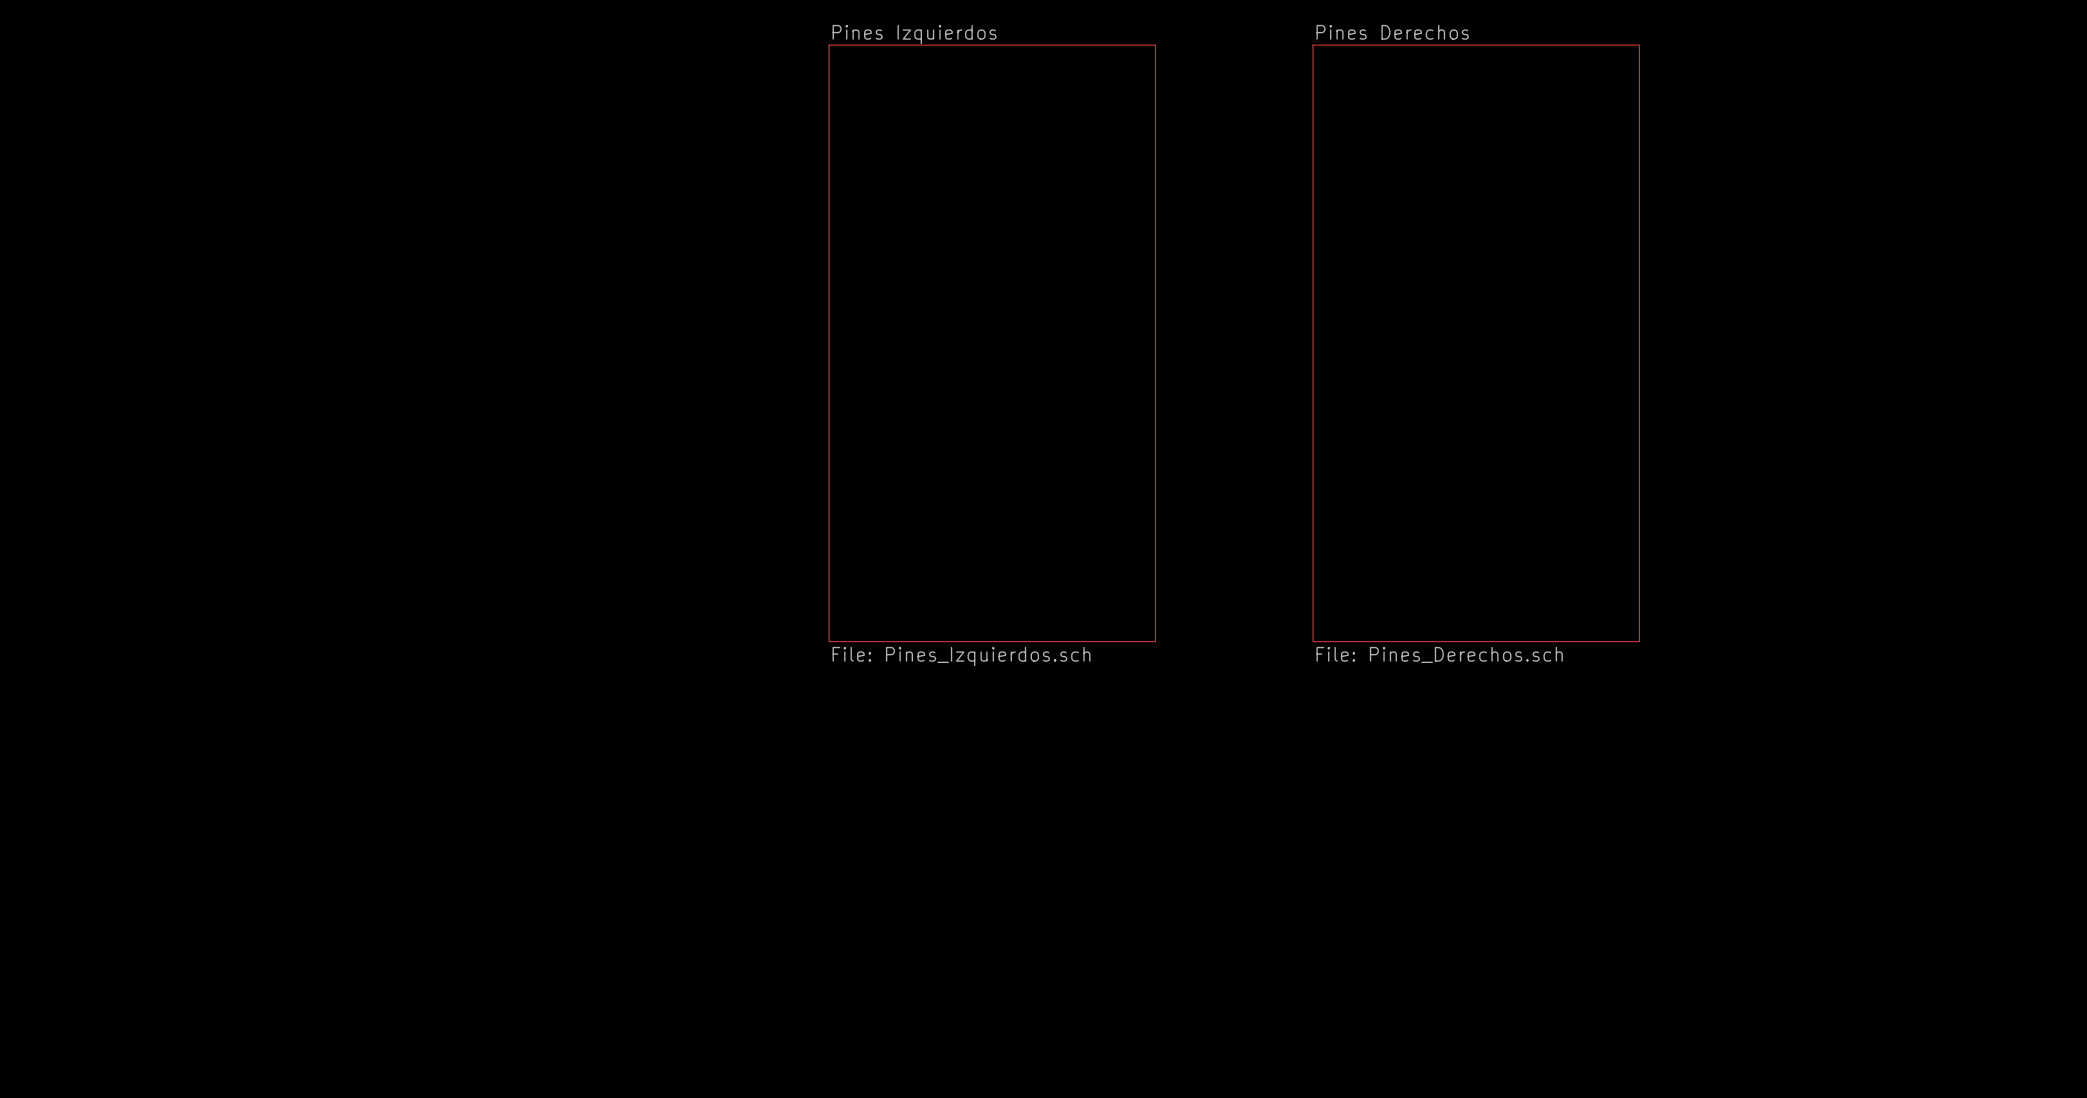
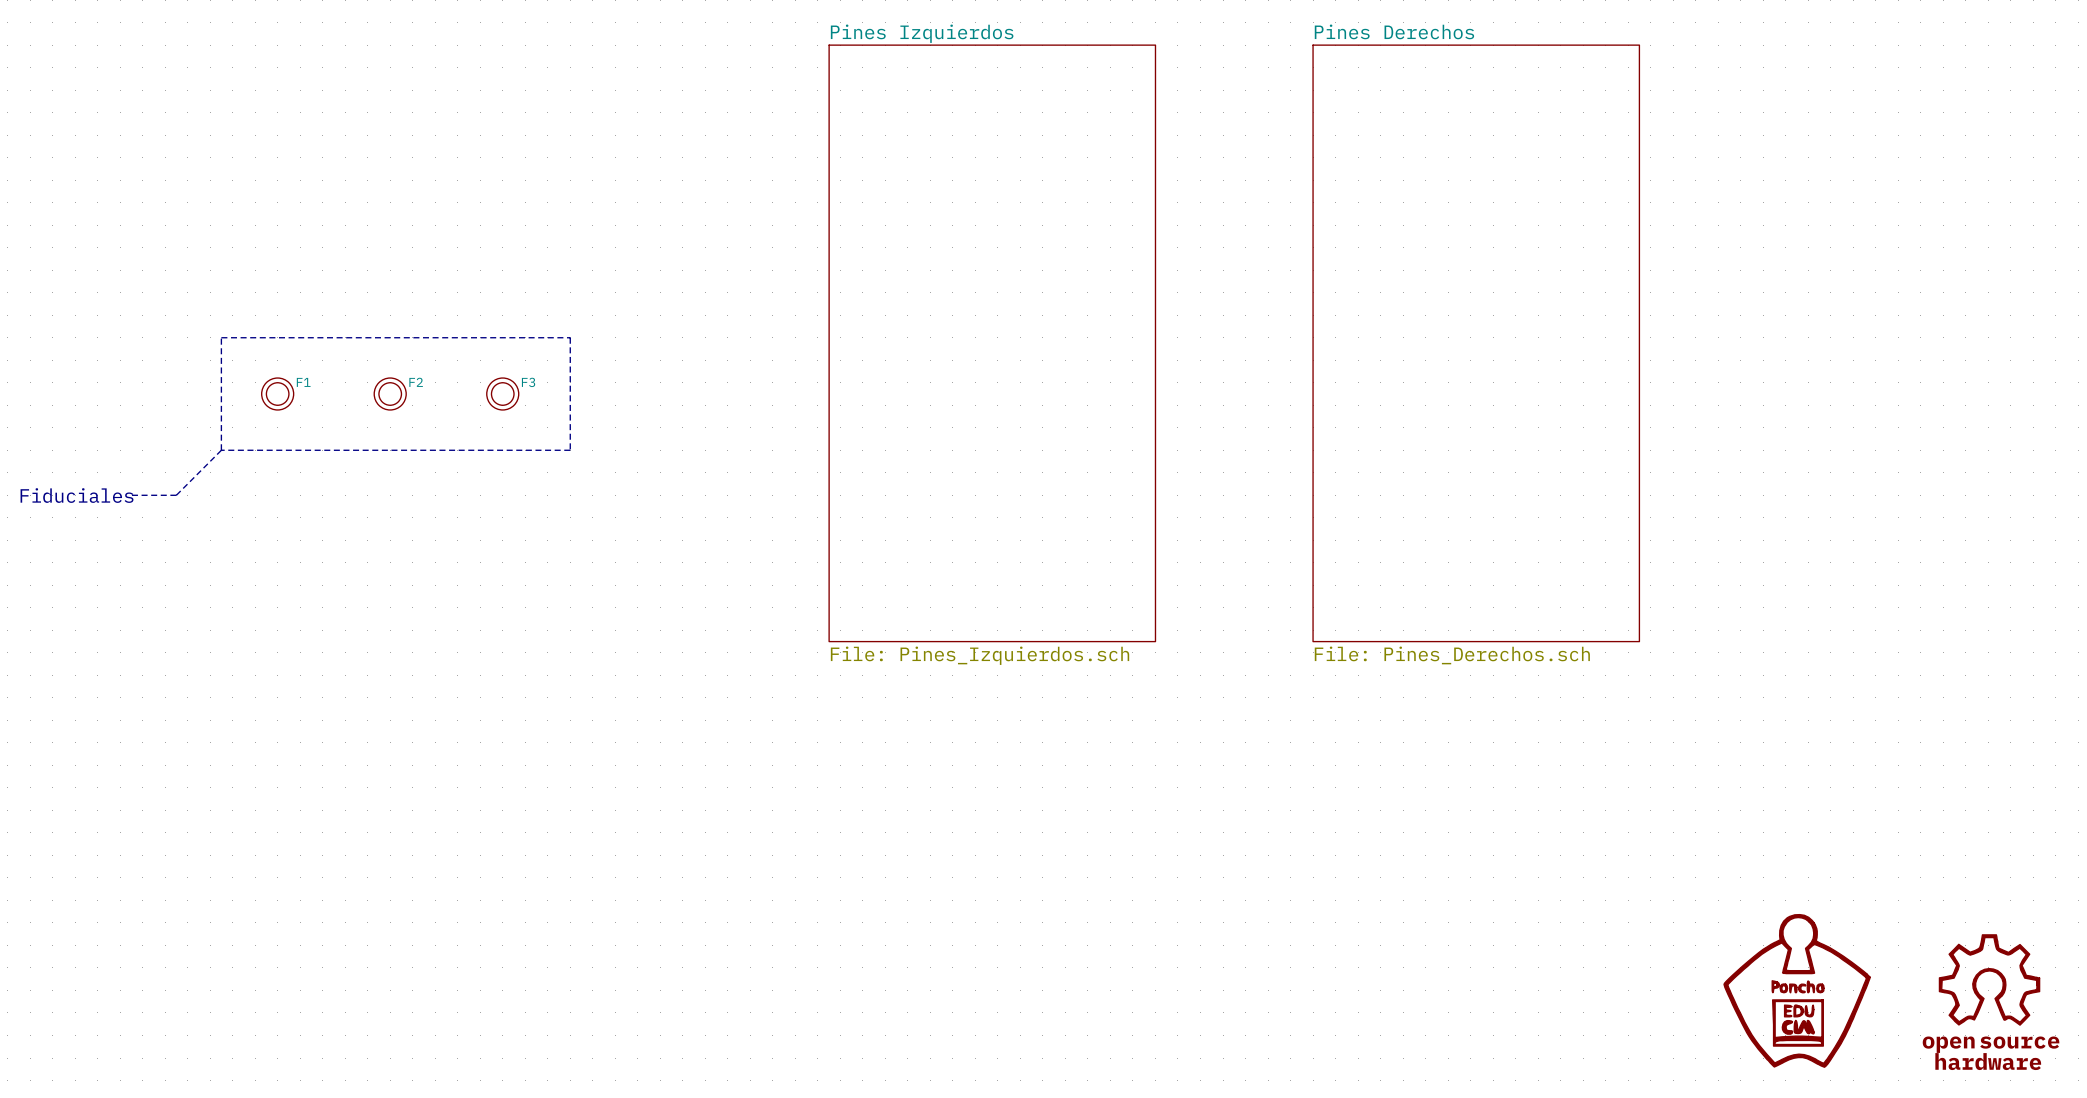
F1: none -> (277, 394)
F2: none -> (390, 394)
F3: none -> (502, 394)
line: none -> (221, 450) (570, 450) (570, 337) (221, 337) (221, 450)
line: none -> (221, 450) (176, 495) (131, 495)
text: none -> Fiduciales (77, 495)
power symbol: none -> (1989, 980)
power symbol: none -> (1797, 990)

